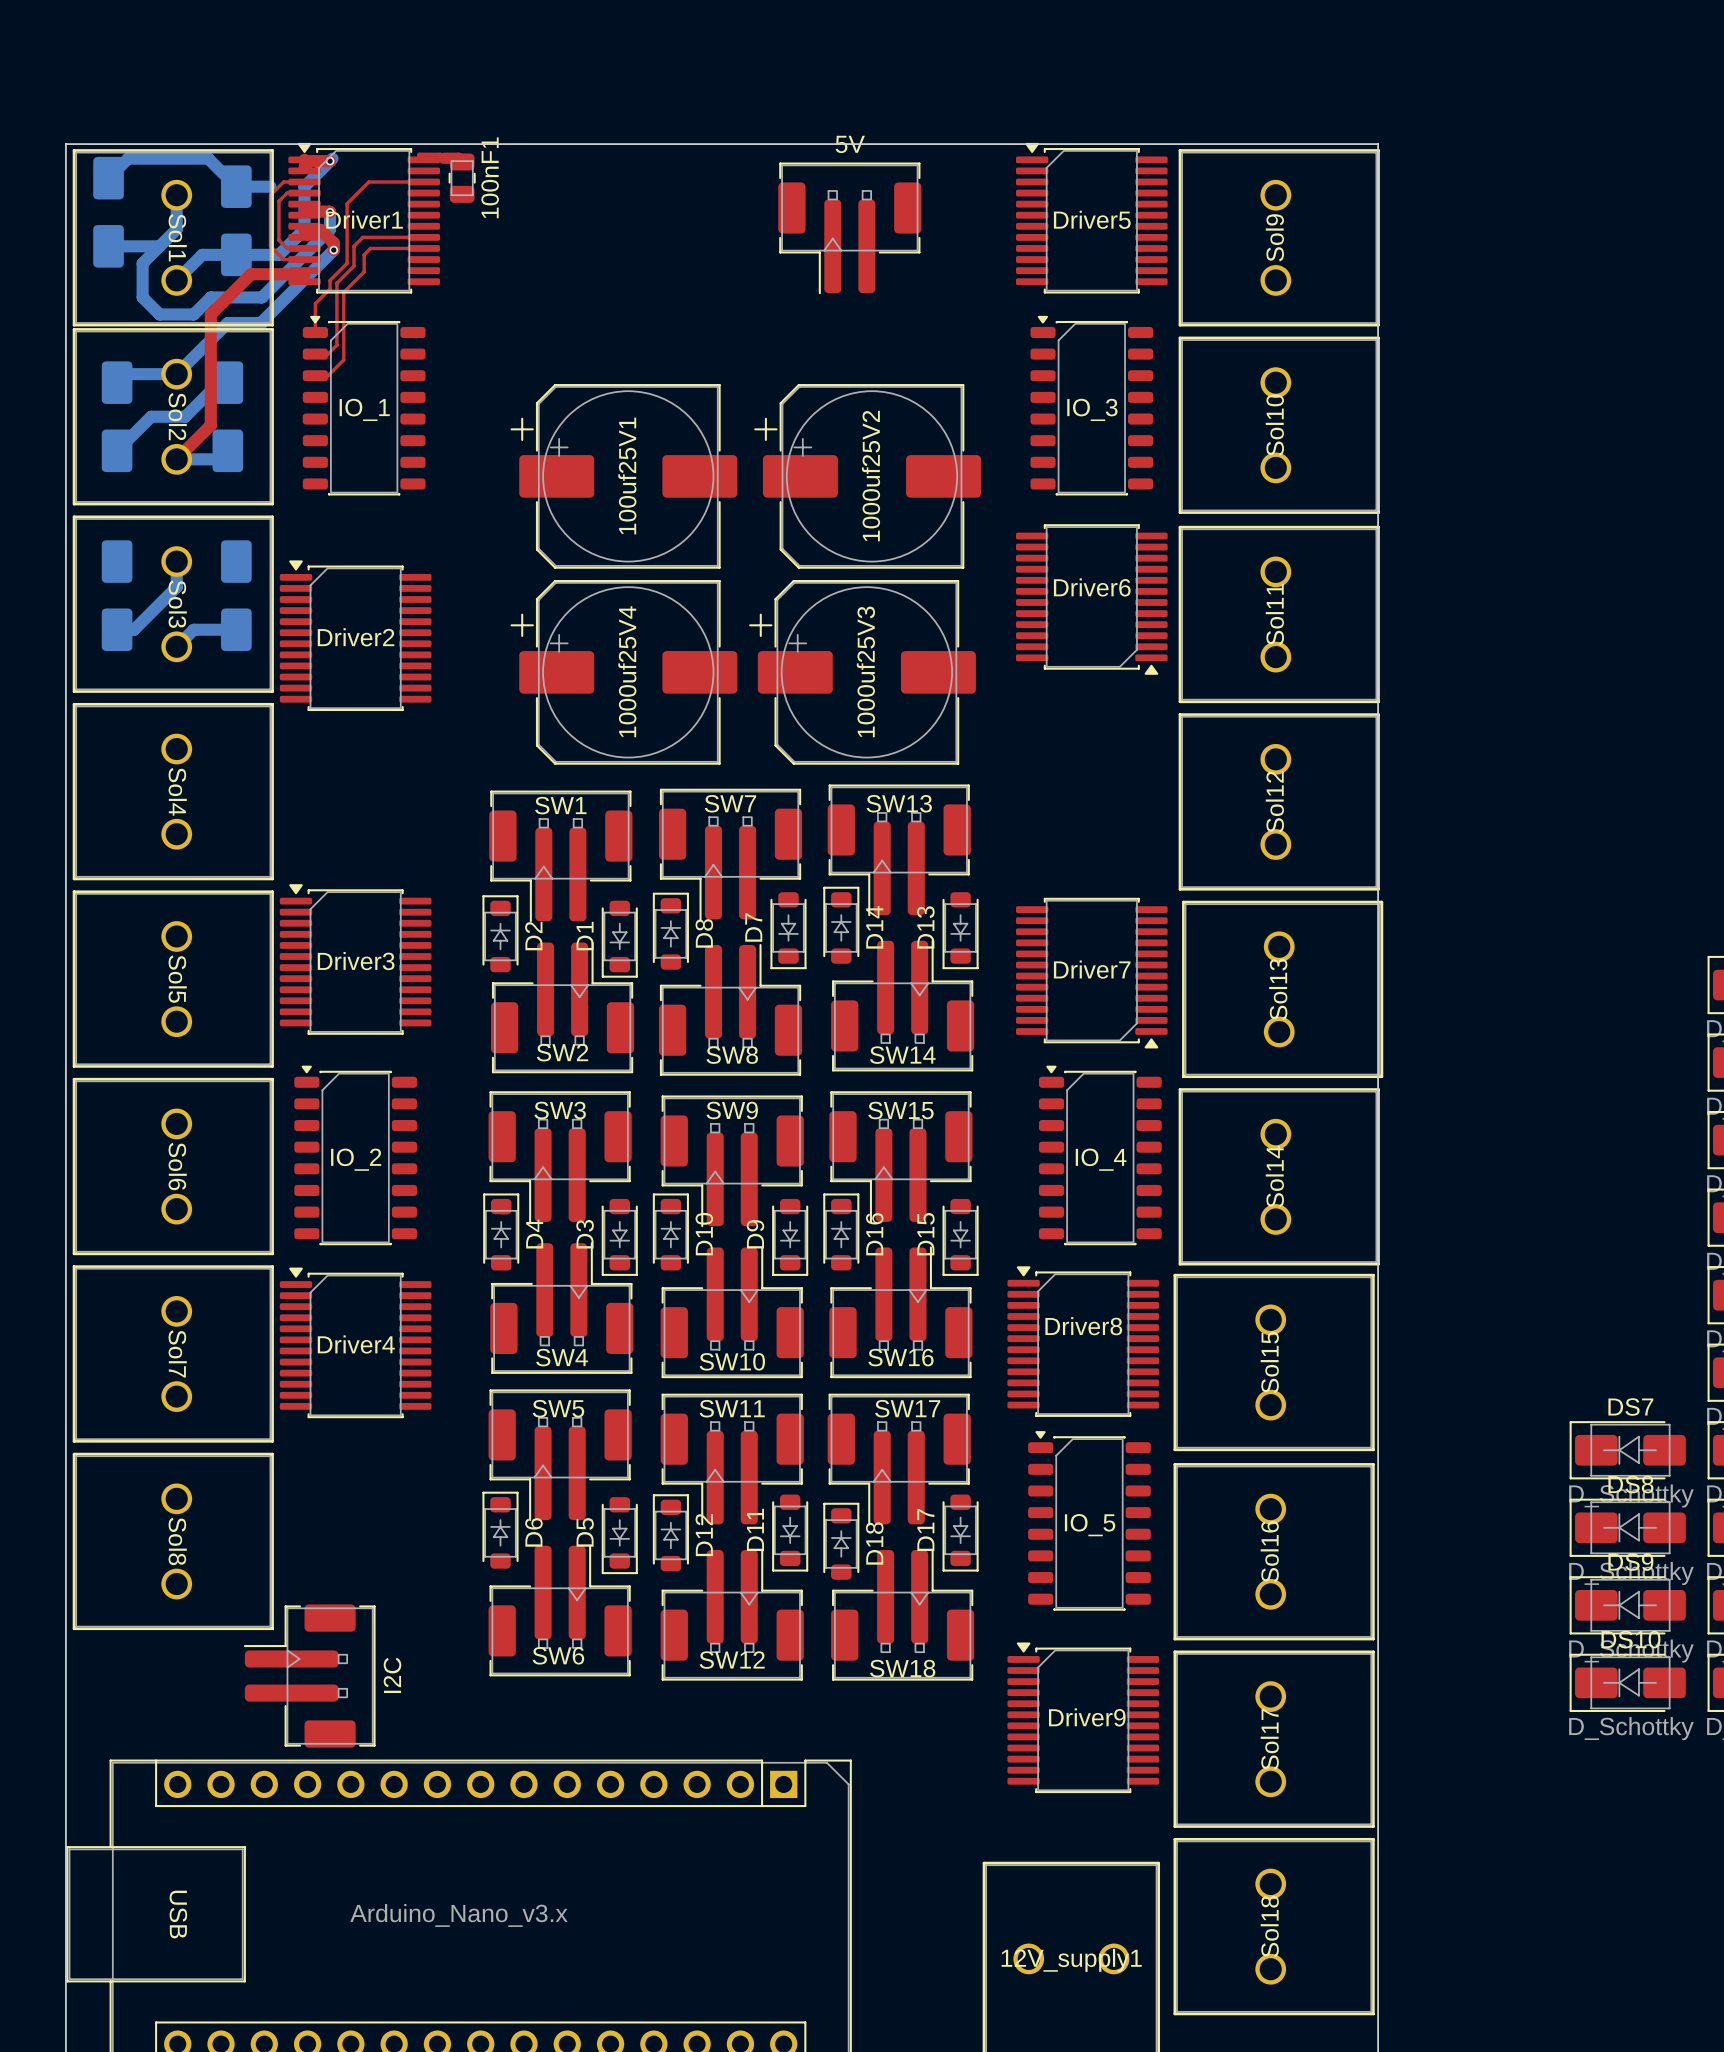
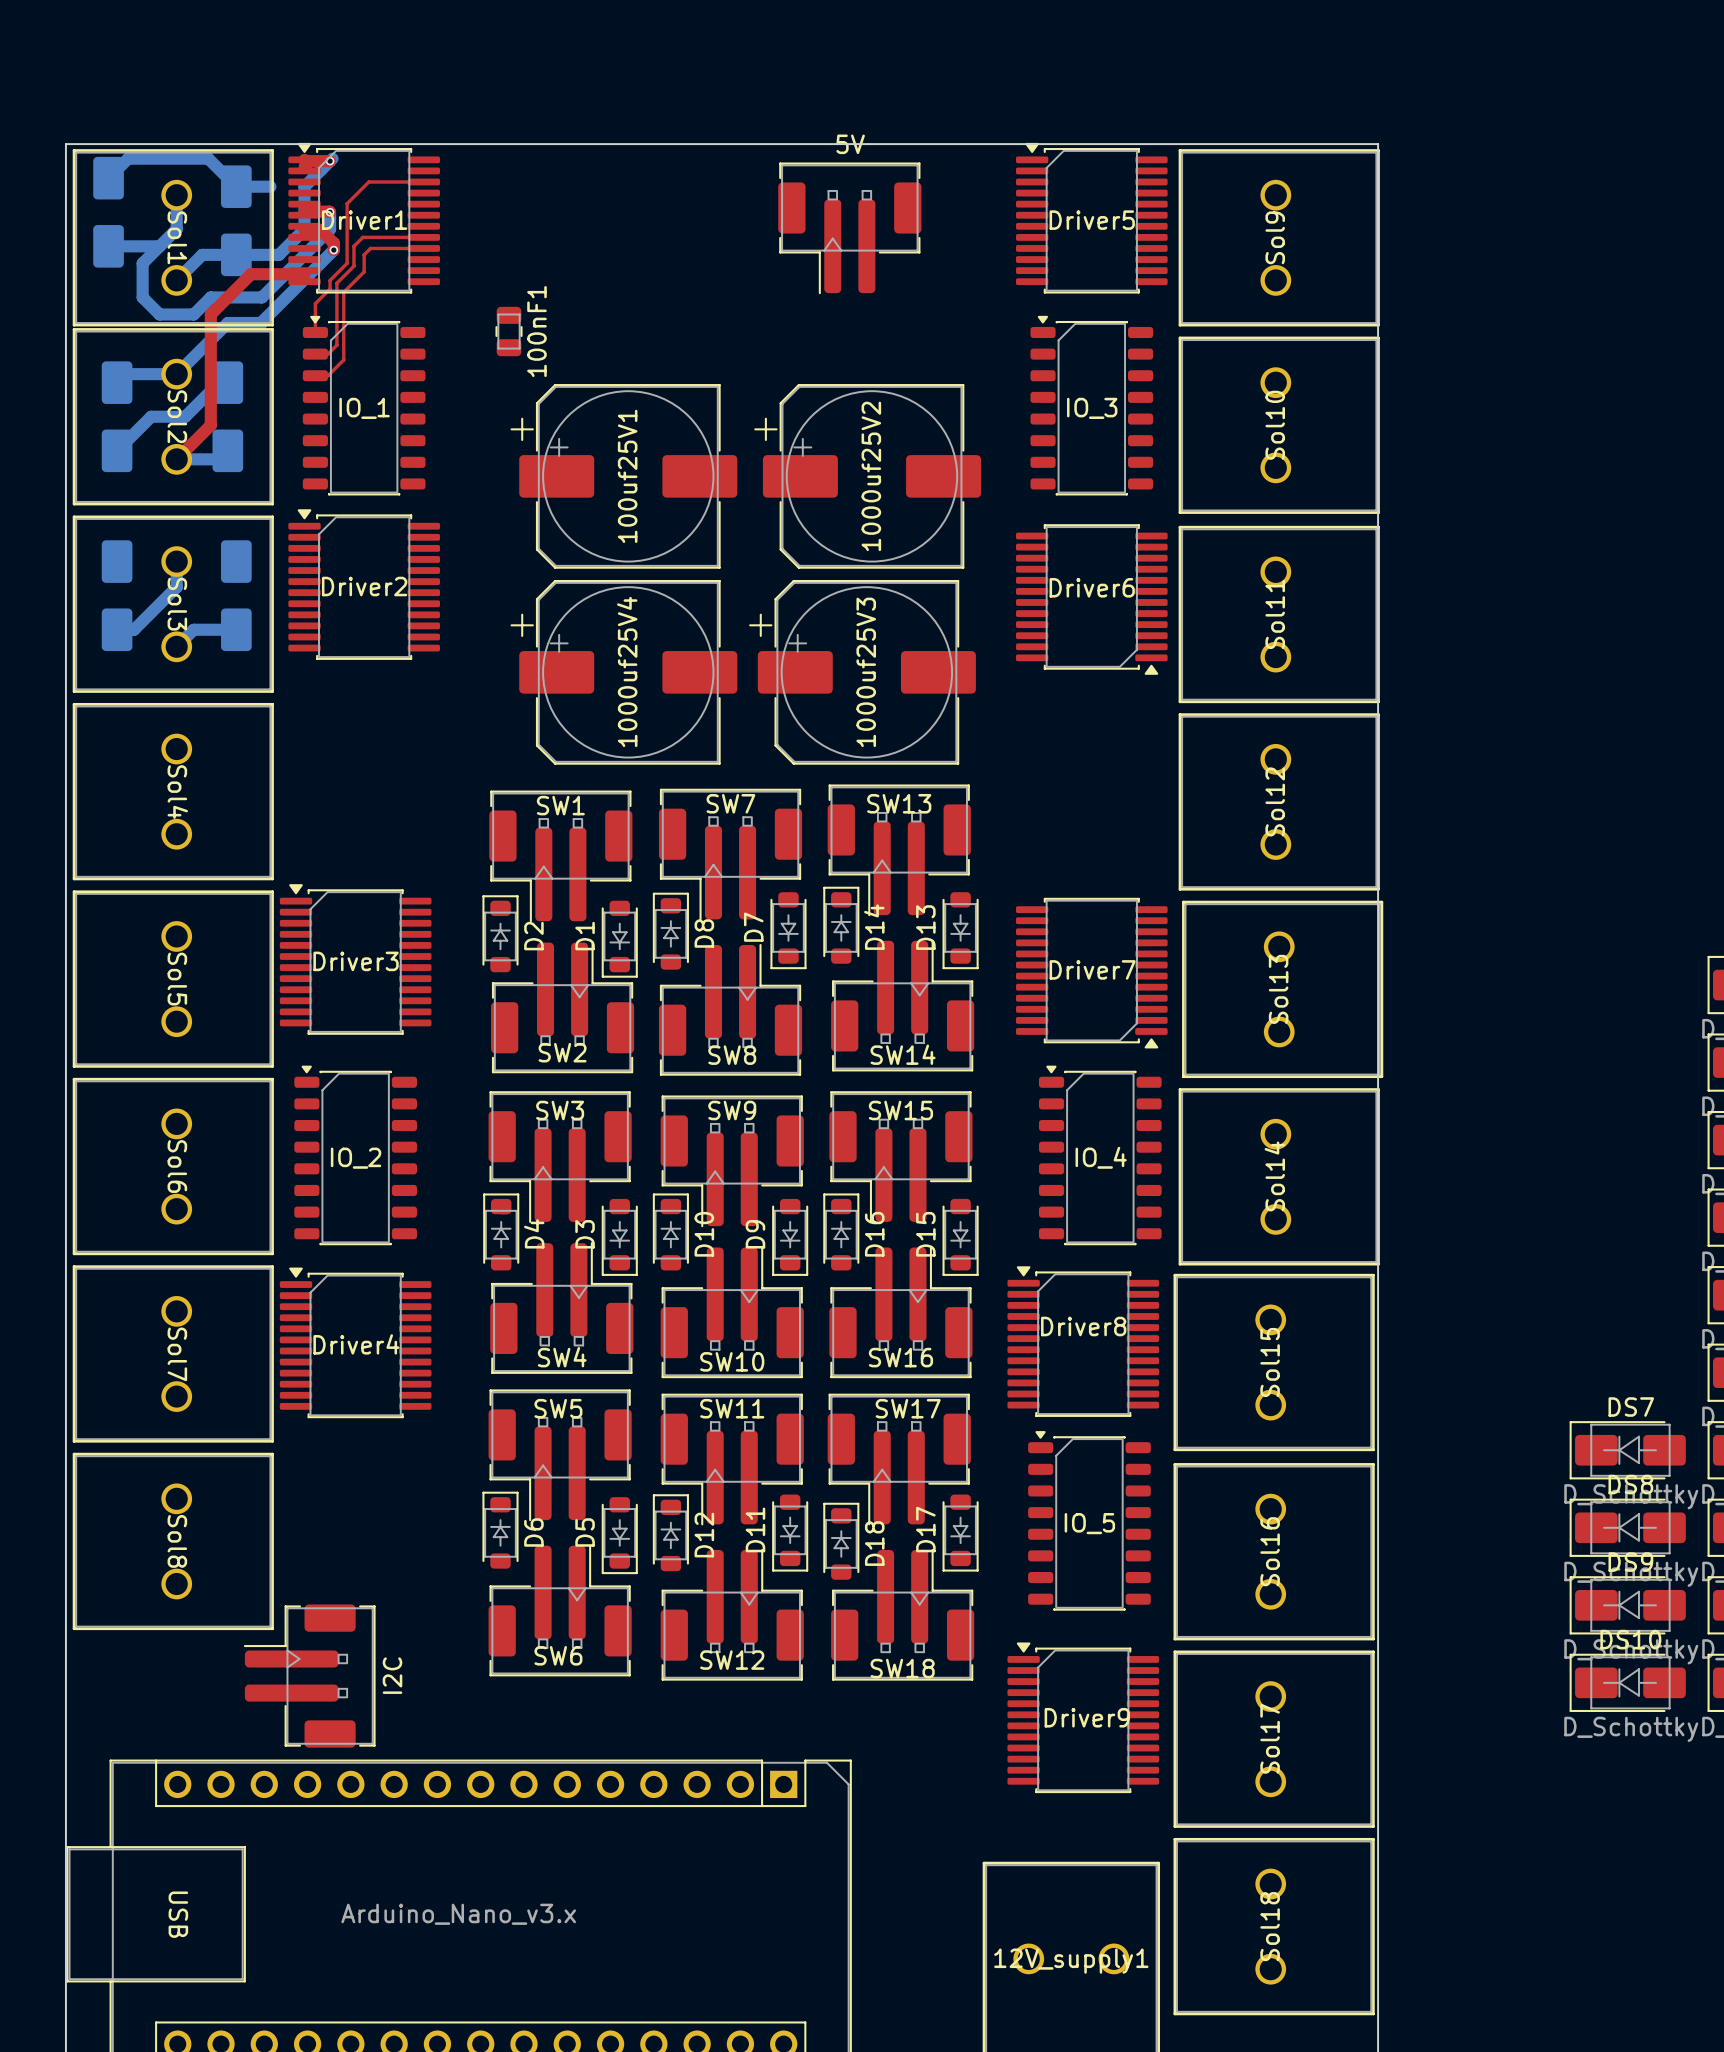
top track: (423, 159) (419, 154) (440, 154) (443, 158) (458, 158) (462, 161) -> none
100nF1 position: (462, 178) -> (509, 331)
top track: (304, 182) (283, 182) (270, 195) (270, 246) (283, 259) (304, 259) -> none
top track: (304, 193) (287, 193) (278, 201) (278, 240) (287, 248) (304, 248) -> none
Driver2 position: (355, 635) -> (364, 584)

